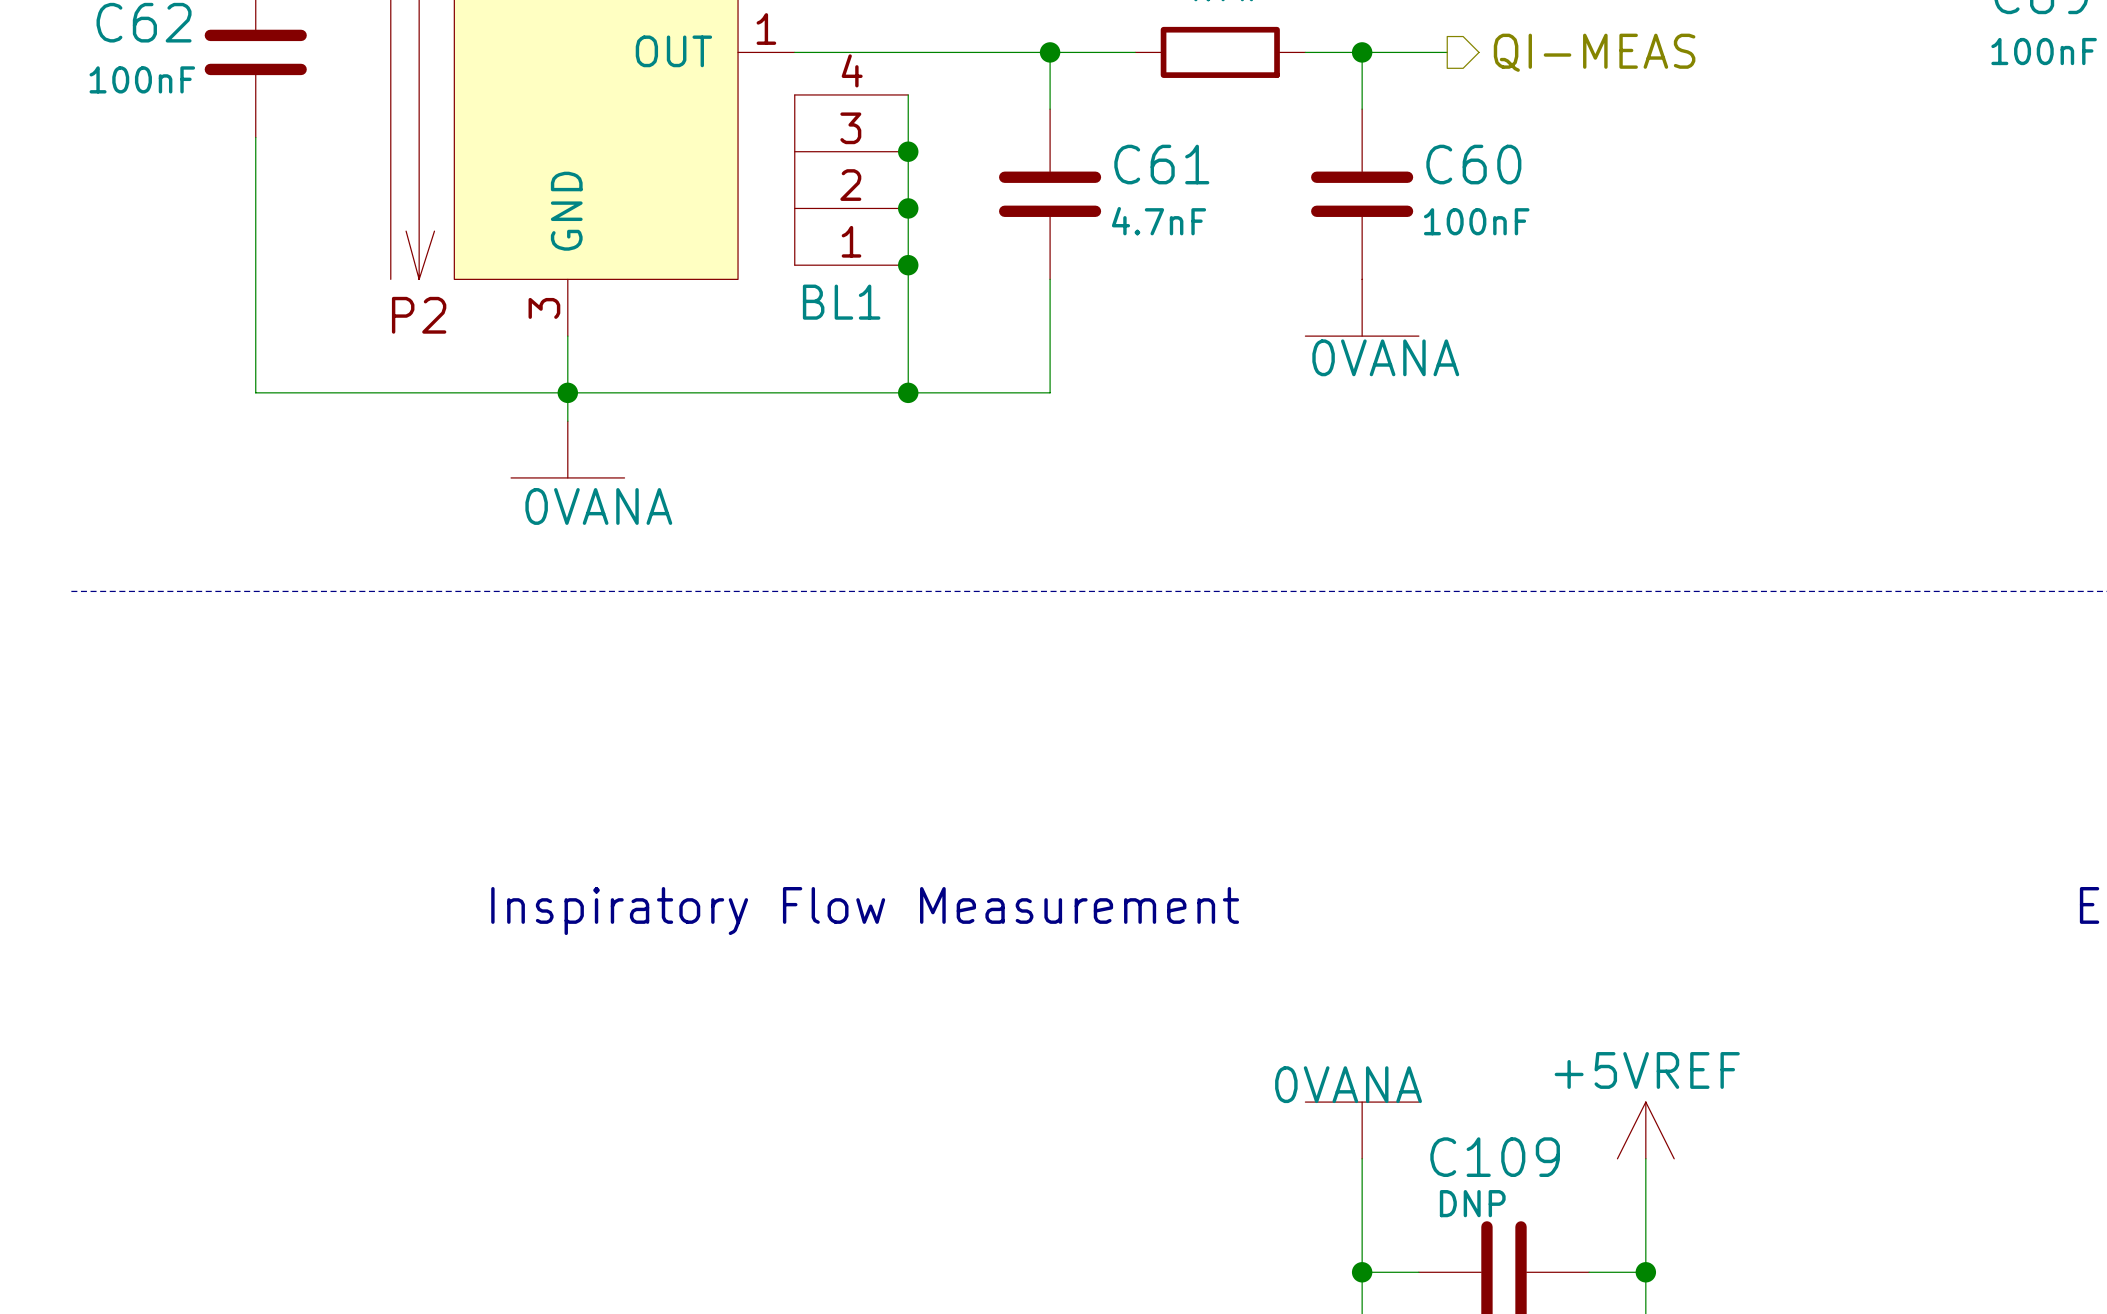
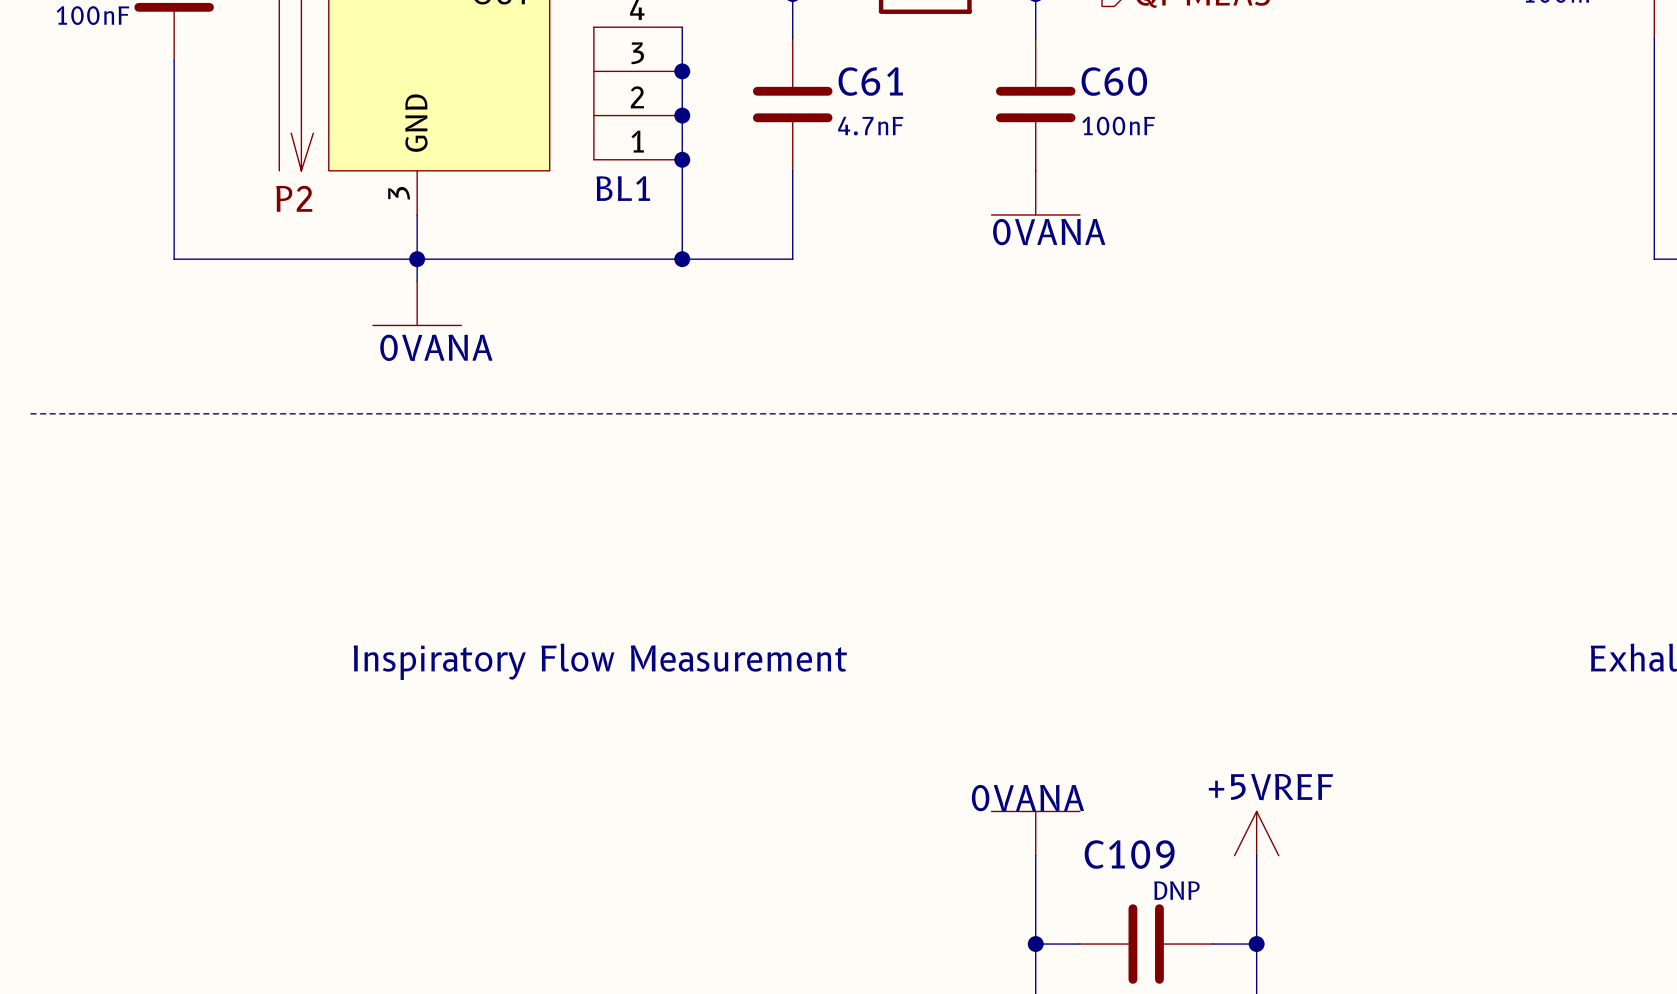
C109 value position: DNP (1472, 1203) -> DNP (1176, 890)

